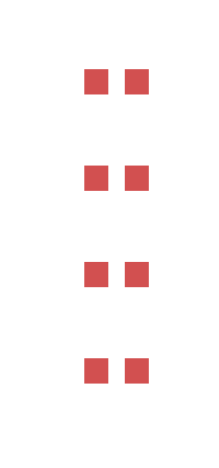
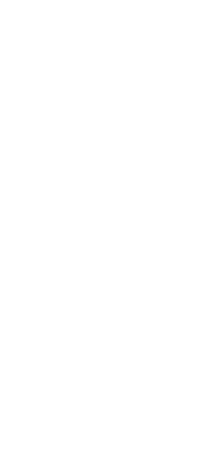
part: (116, 81) -> none
part: (116, 178) -> none
part: (116, 274) -> none
part: (116, 370) -> none

